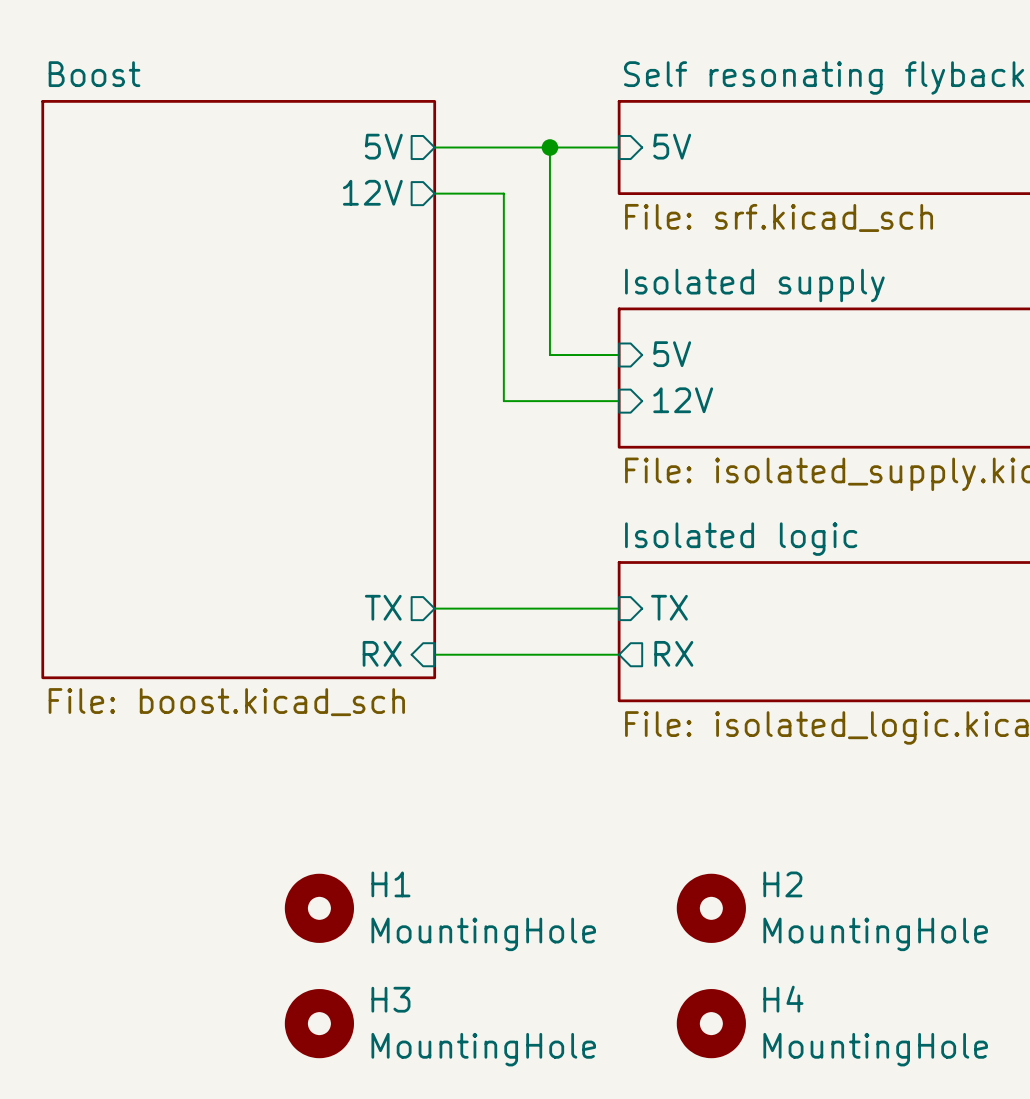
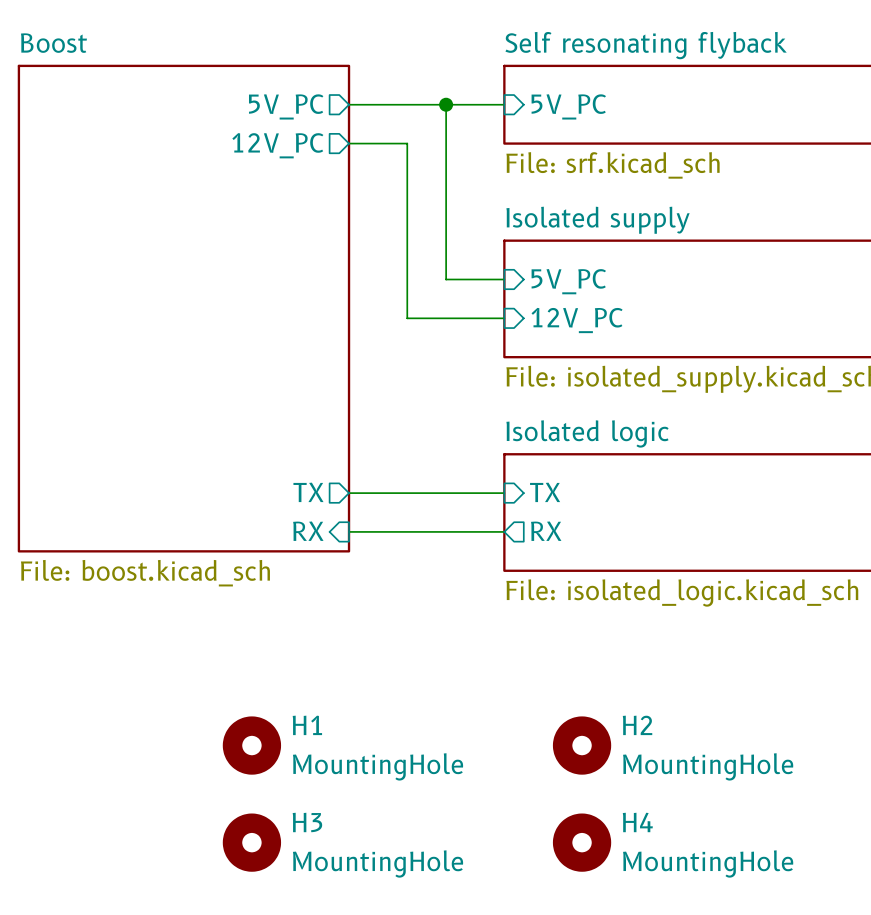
sheet pin: 5V (383, 146) -> 5V_PC (286, 106)
sheet pin: 5V (672, 146) -> 5V_PC (568, 106)
sheet pin: 12V (372, 192) -> 12V_PC (277, 145)
sheet pin: 5V (672, 354) -> 5V_PC (568, 281)
sheet pin: 12V (683, 400) -> 12V_PC (577, 320)

